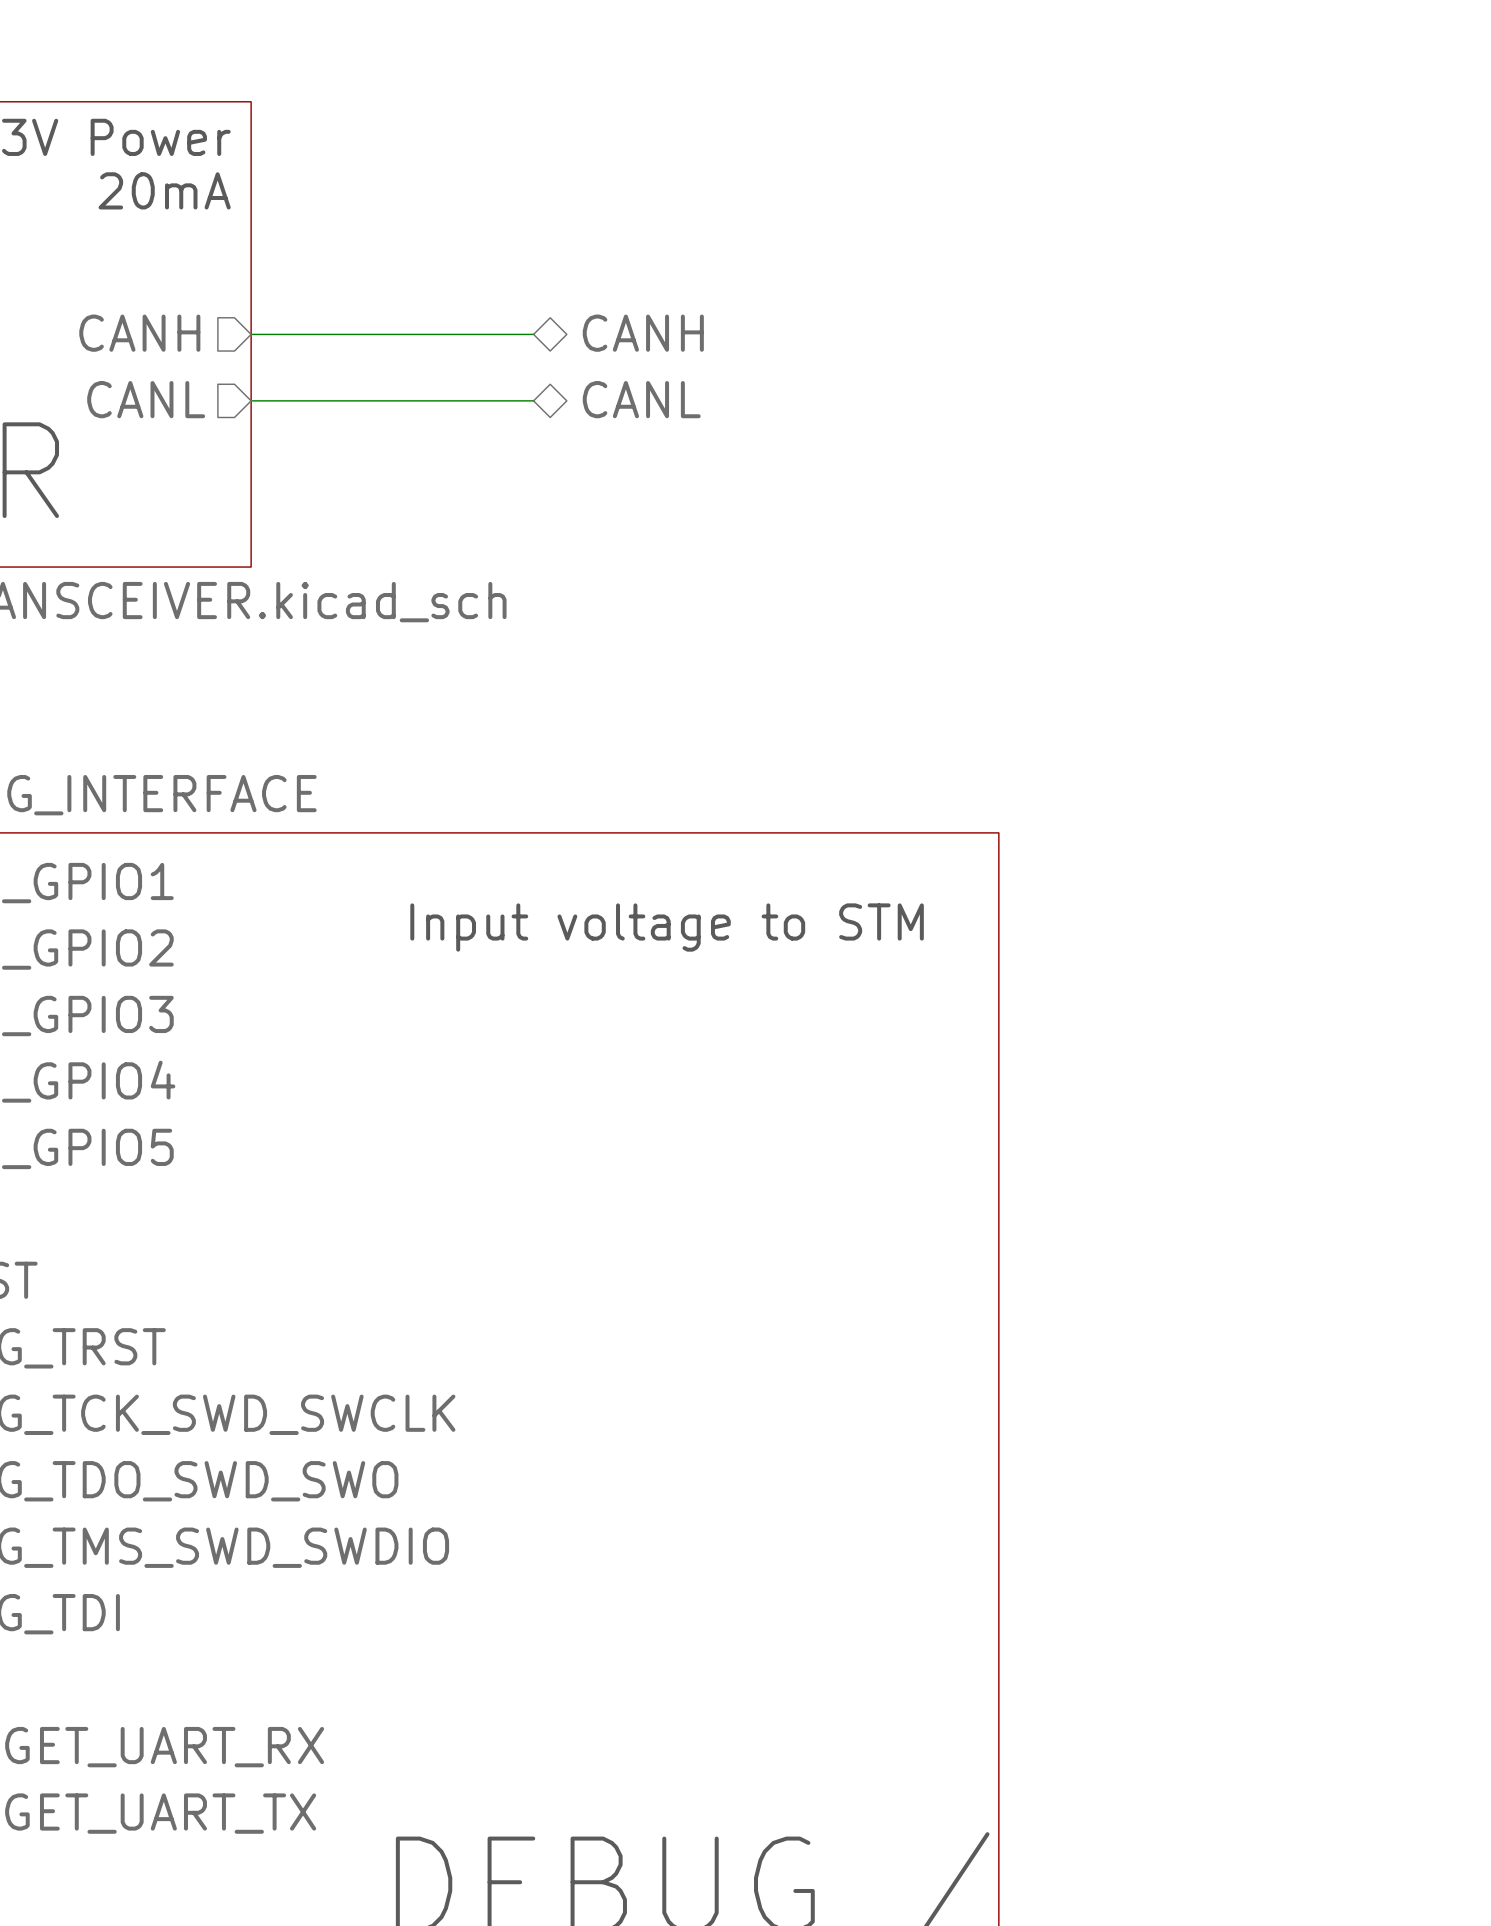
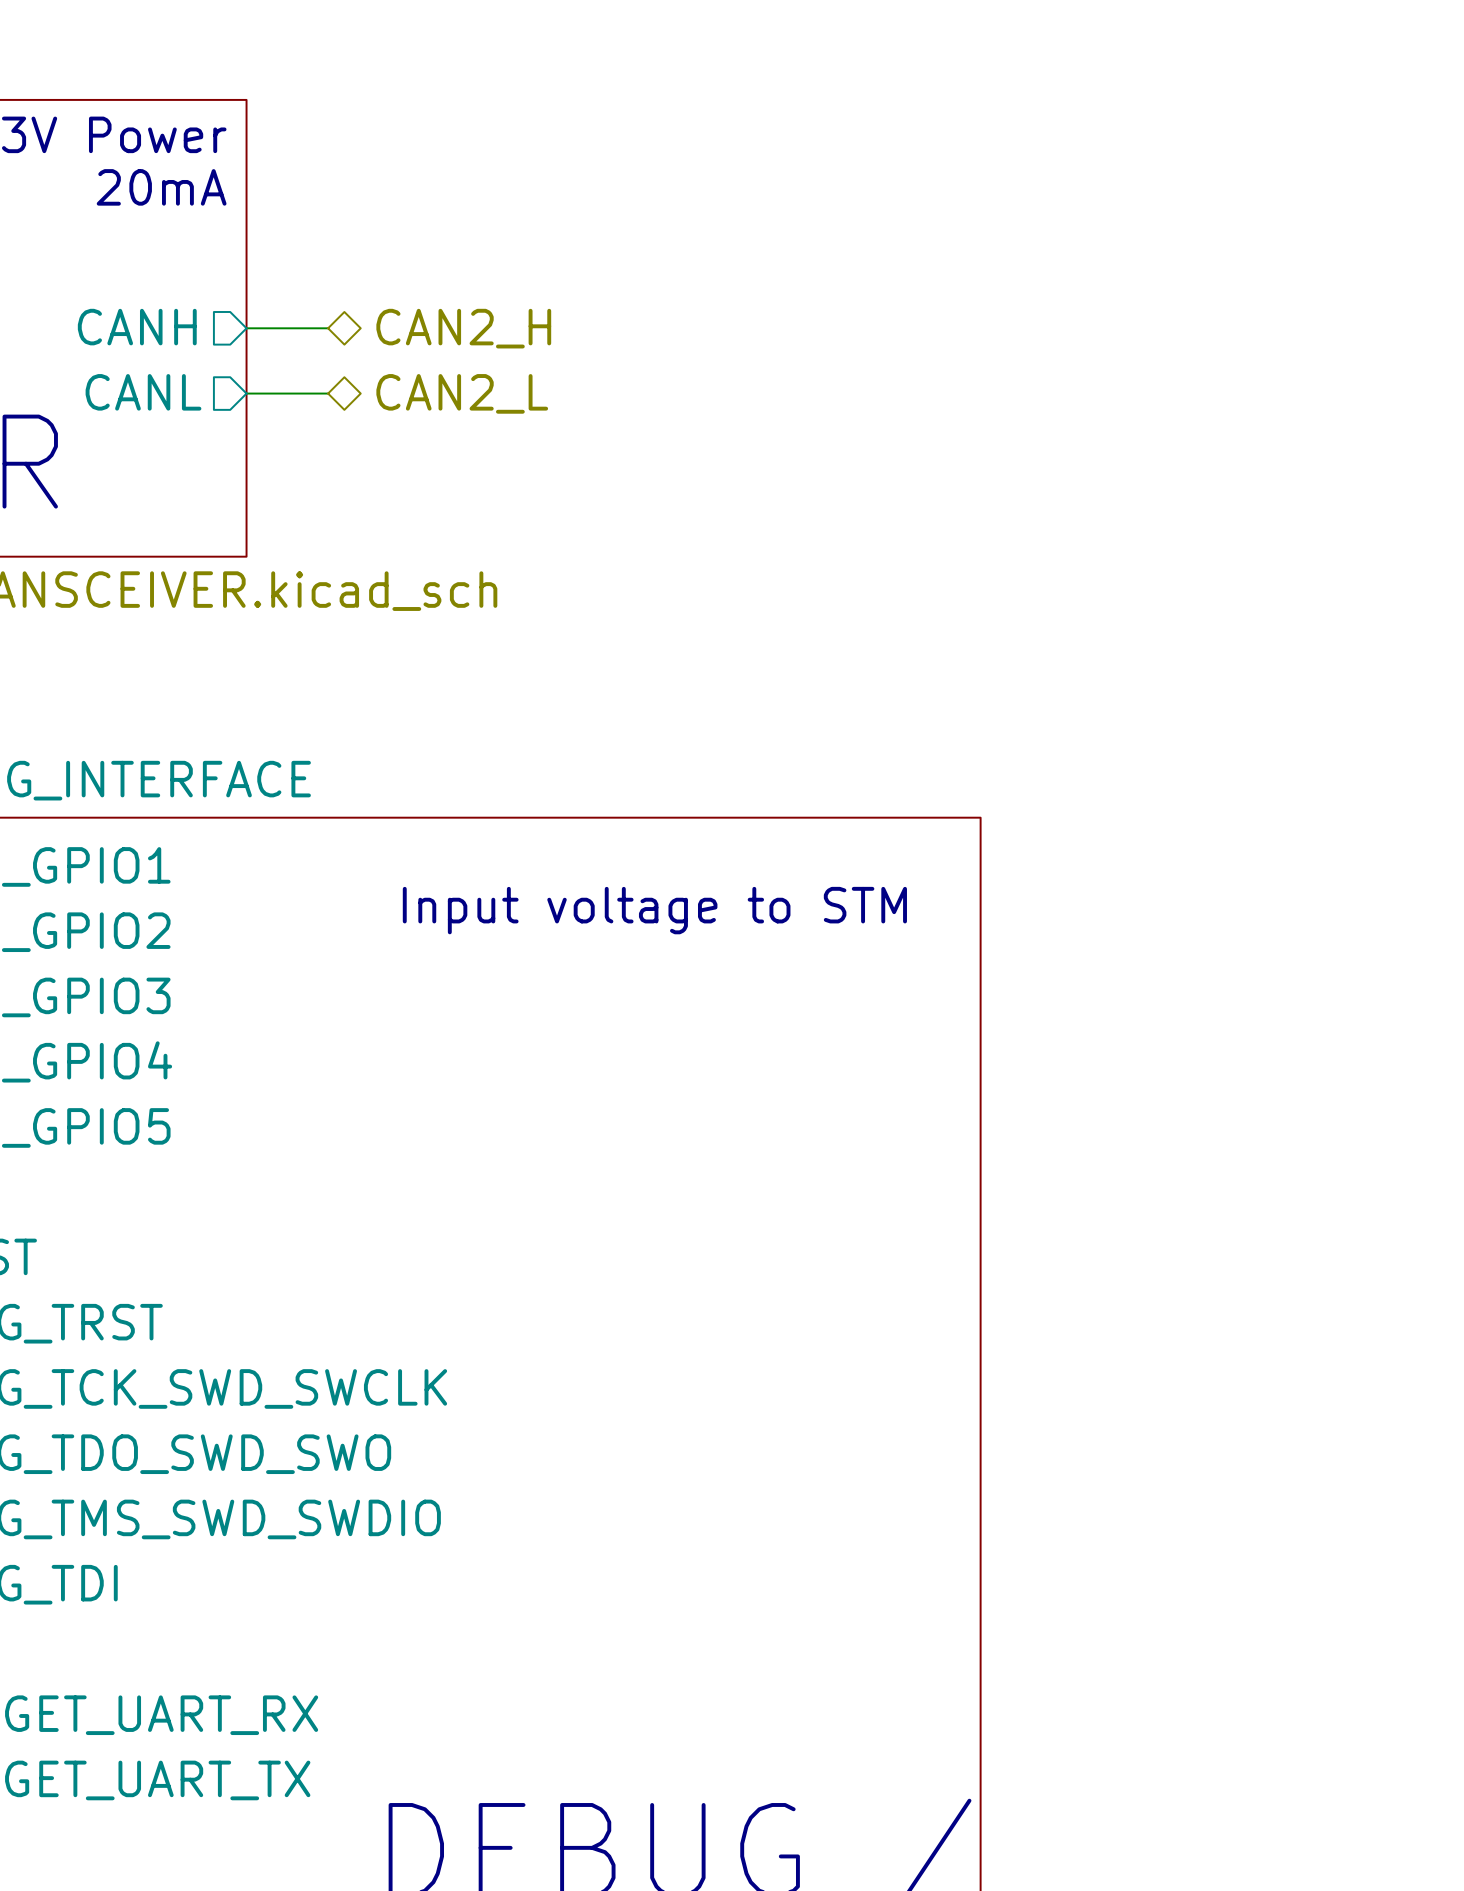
hierarchical label: CANH (643, 333) -> CAN2_H (463, 328)
wire: (334, 334) (533, 334) -> none
hierarchical label: CANL (641, 399) -> CAN2_L (462, 393)
wire: (334, 400) (533, 400) -> none

